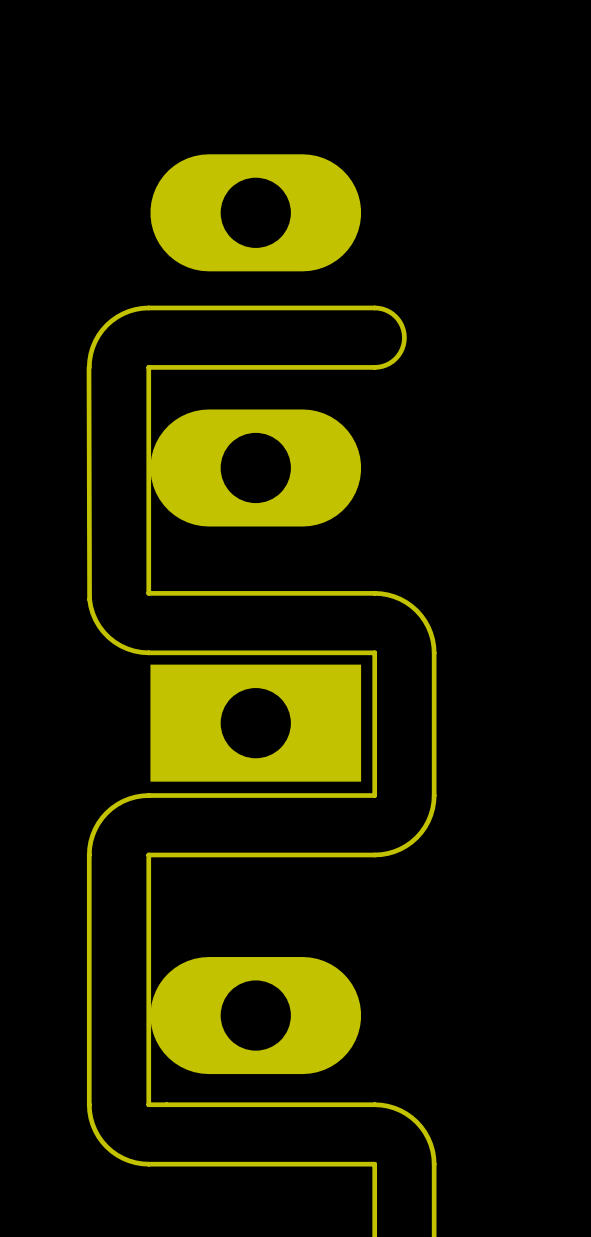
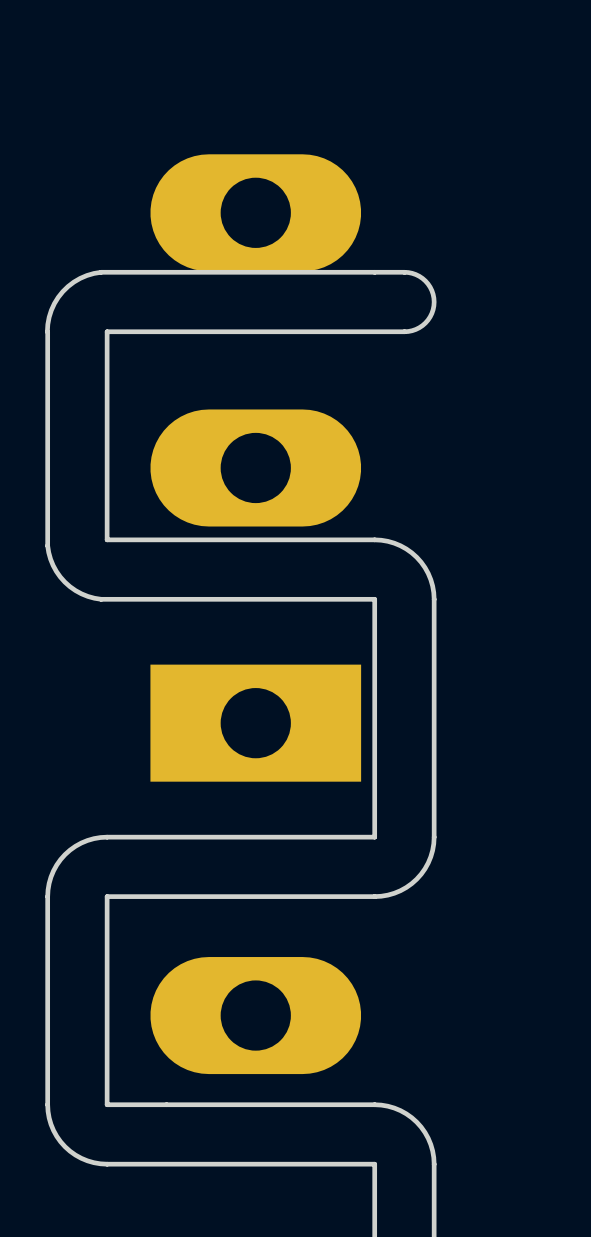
board edge: none -> (47, 331) (47, 545) (53, 565) (64, 582) (81, 593) (101, 599) (374, 599) (374, 652)
board edge: (434, 652) (430, 633) (421, 615) (406, 602) (387, 594) (148, 593) (148, 367) (382, 366) (395, 358) (403, 345) (403, 329) (395, 316) (386, 310) (374, 307) (148, 307) (129, 311) (111, 320) (95, 341) (89, 367) (89, 599) (92, 613) (103, 632) (120, 645) (141, 652) (374, 652) -> (434, 652) (434, 599) (430, 579) (416, 557) (394, 543) (374, 539) (107, 539) (107, 331) (408, 331) (415, 329) (425, 323) (433, 309) (434, 302) (431, 290) (422, 278) (412, 273) (404, 272) (101, 272) (80, 278) (62, 291) (51, 310) (47, 331)
board edge: (374, 795) (142, 795) (117, 804) (98, 823) (92, 835) (89, 854) (89, 1111) (95, 1130) (111, 1151) (129, 1160) (148, 1164) -> (374, 795) (374, 837) (100, 837) (75, 846) (56, 864) (49, 883) (47, 896) (47, 1104) (51, 1124) (65, 1146) (87, 1160) (107, 1164) (148, 1164)
board edge: (434, 795) (430, 815) (421, 832) (406, 845) (387, 853) (148, 854) (148, 1104) -> (434, 795) (434, 837) (430, 856) (416, 879) (394, 893) (374, 896) (107, 896) (107, 1104) (148, 1104)

